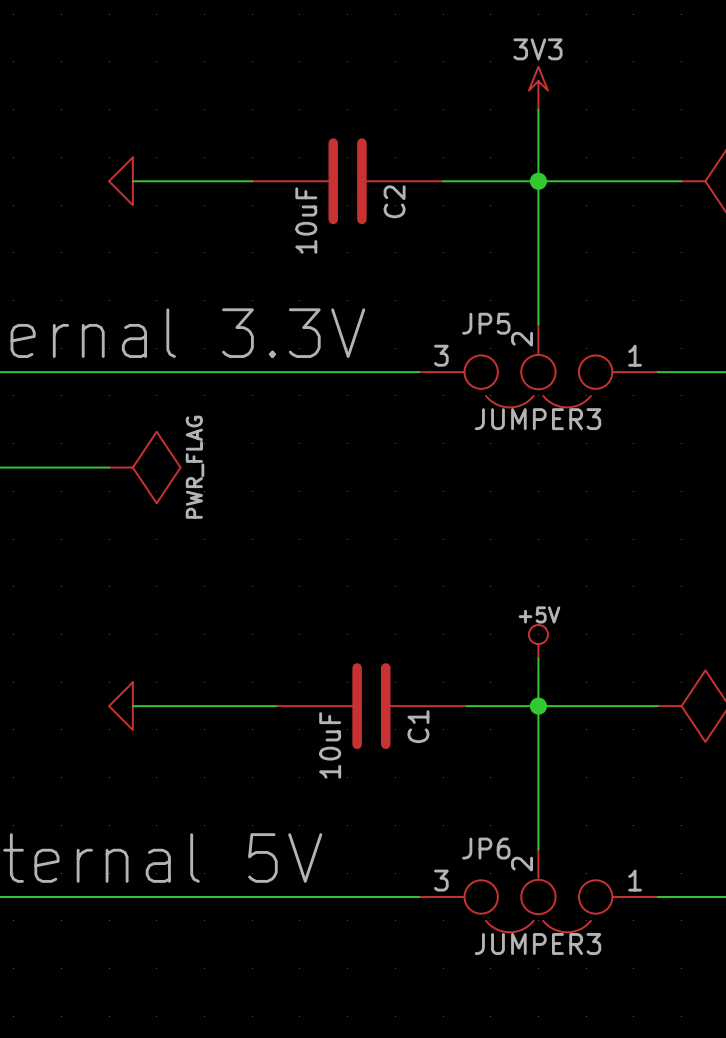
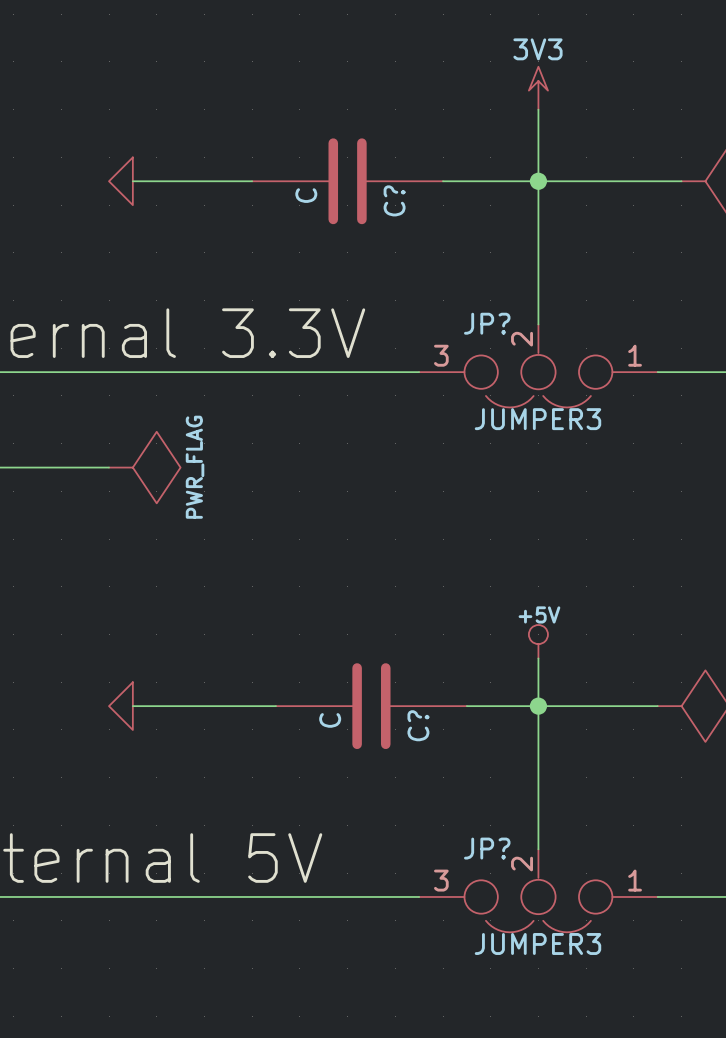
C2 name: C2 (394, 201) -> C? (394, 200)
C2 value: 10uF (306, 220) -> C (306, 195)
JP5 name: JP5 (486, 323) -> JP? (487, 323)
C1 name: C1 (418, 726) -> C? (418, 725)
C1 value: 10uF (330, 745) -> C (330, 720)
JP6 name: JP6 (486, 848) -> JP? (487, 848)

